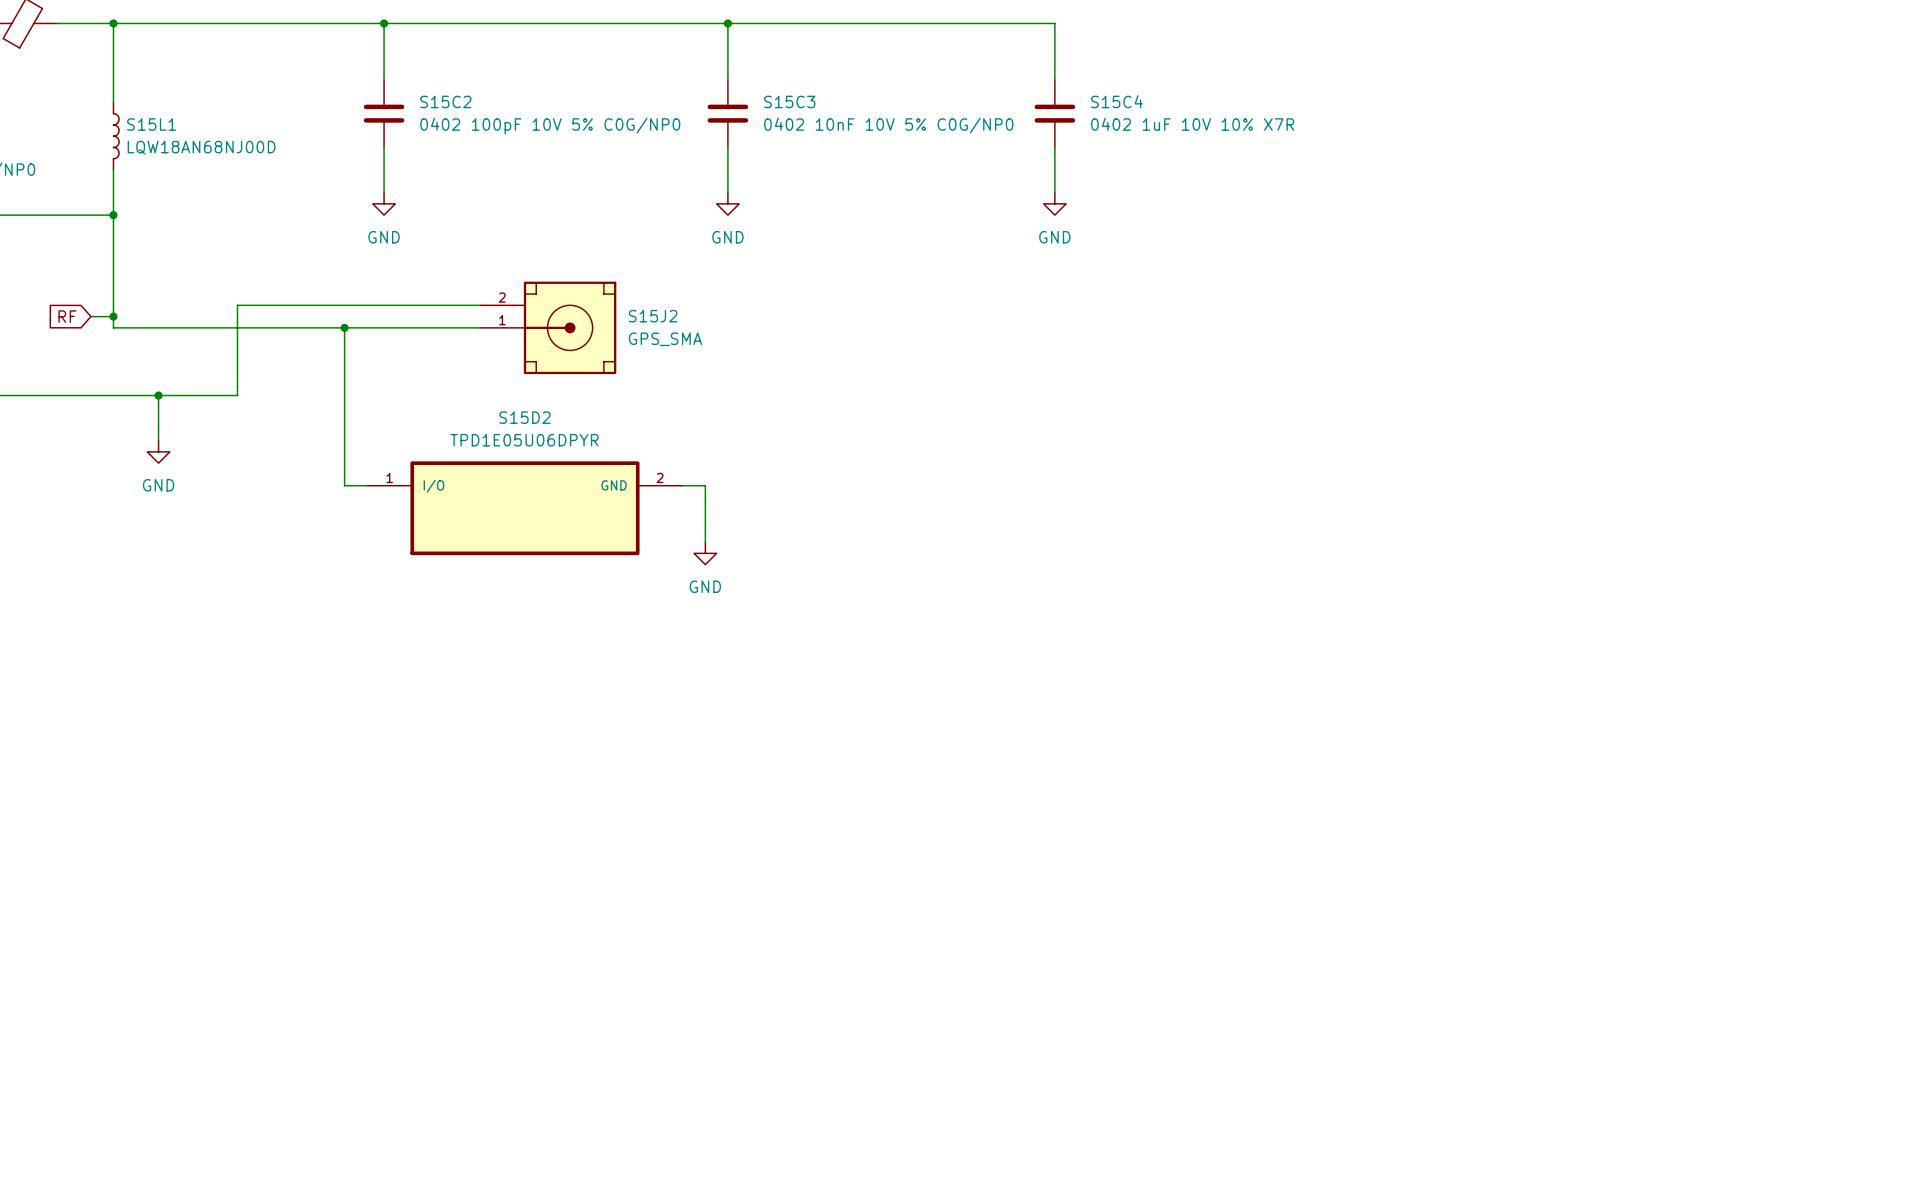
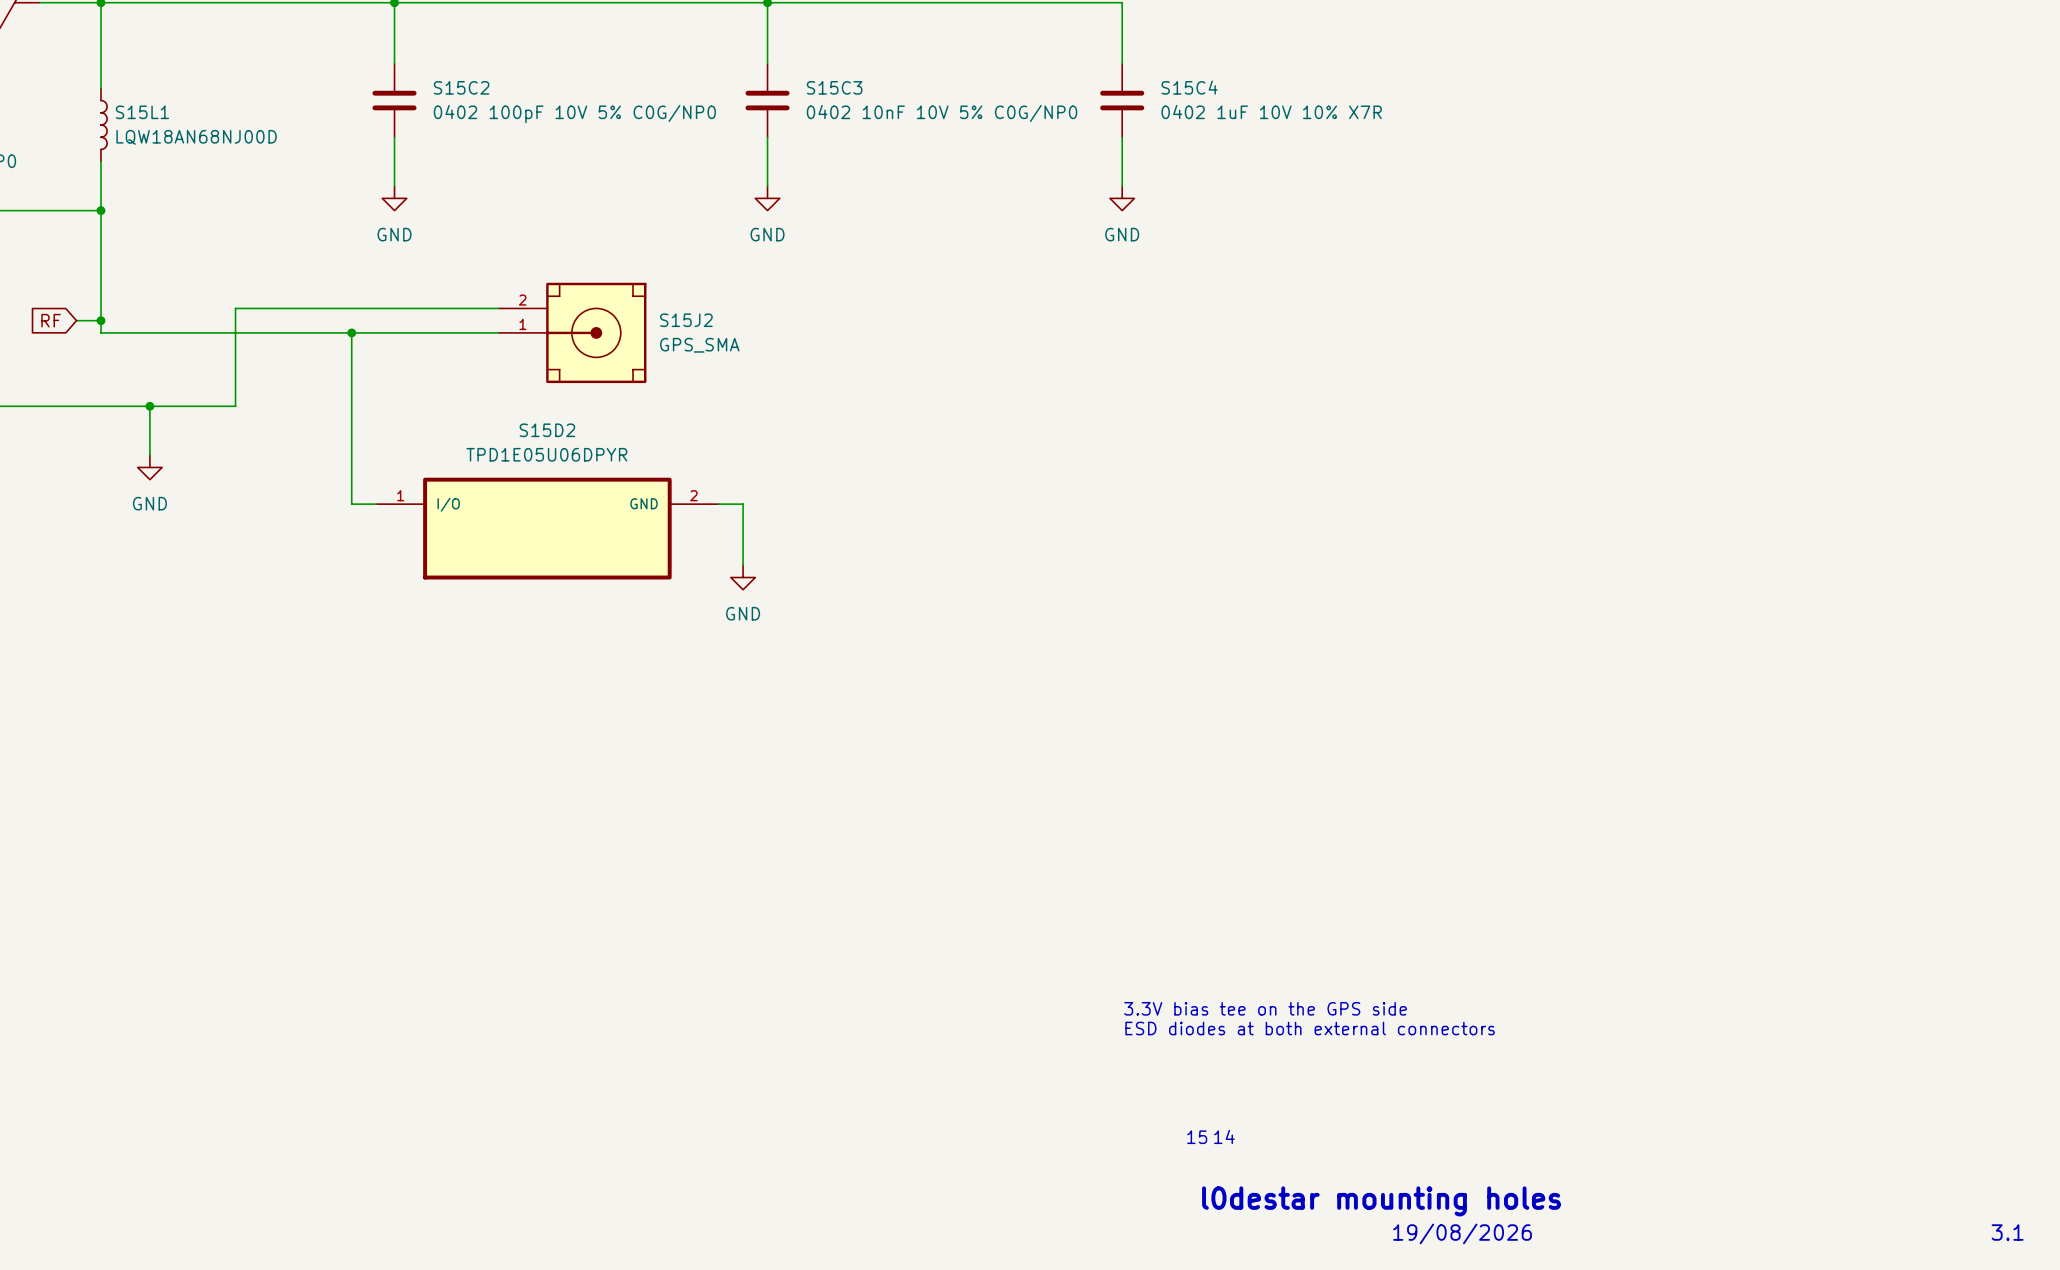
text: none -> 3.3V bias tee on the GPS side (1265, 1008)
text: none -> ESD diodes at both external connectors (1310, 1028)
text: none -> 15 (1197, 1137)
text: none -> 14 (1224, 1136)
text: none -> l0destar mounting holes (1381, 1201)
text: none -> 3.1 (2007, 1232)
text: none -> 19/08/2026 (1462, 1233)

